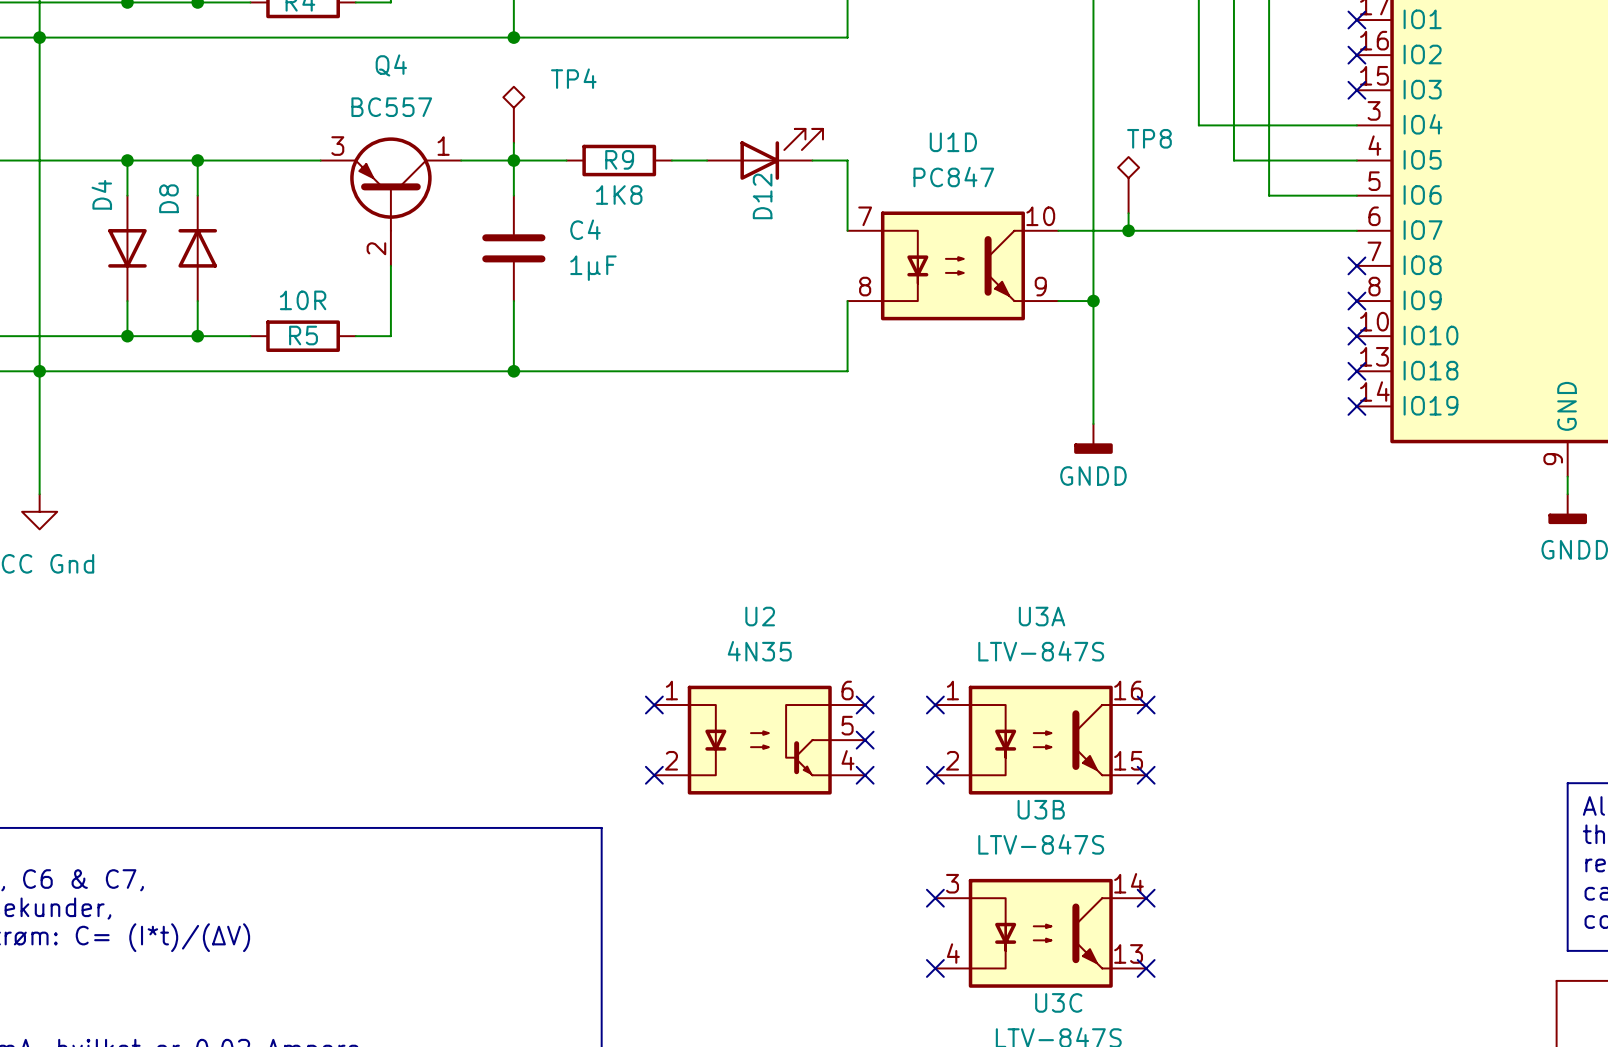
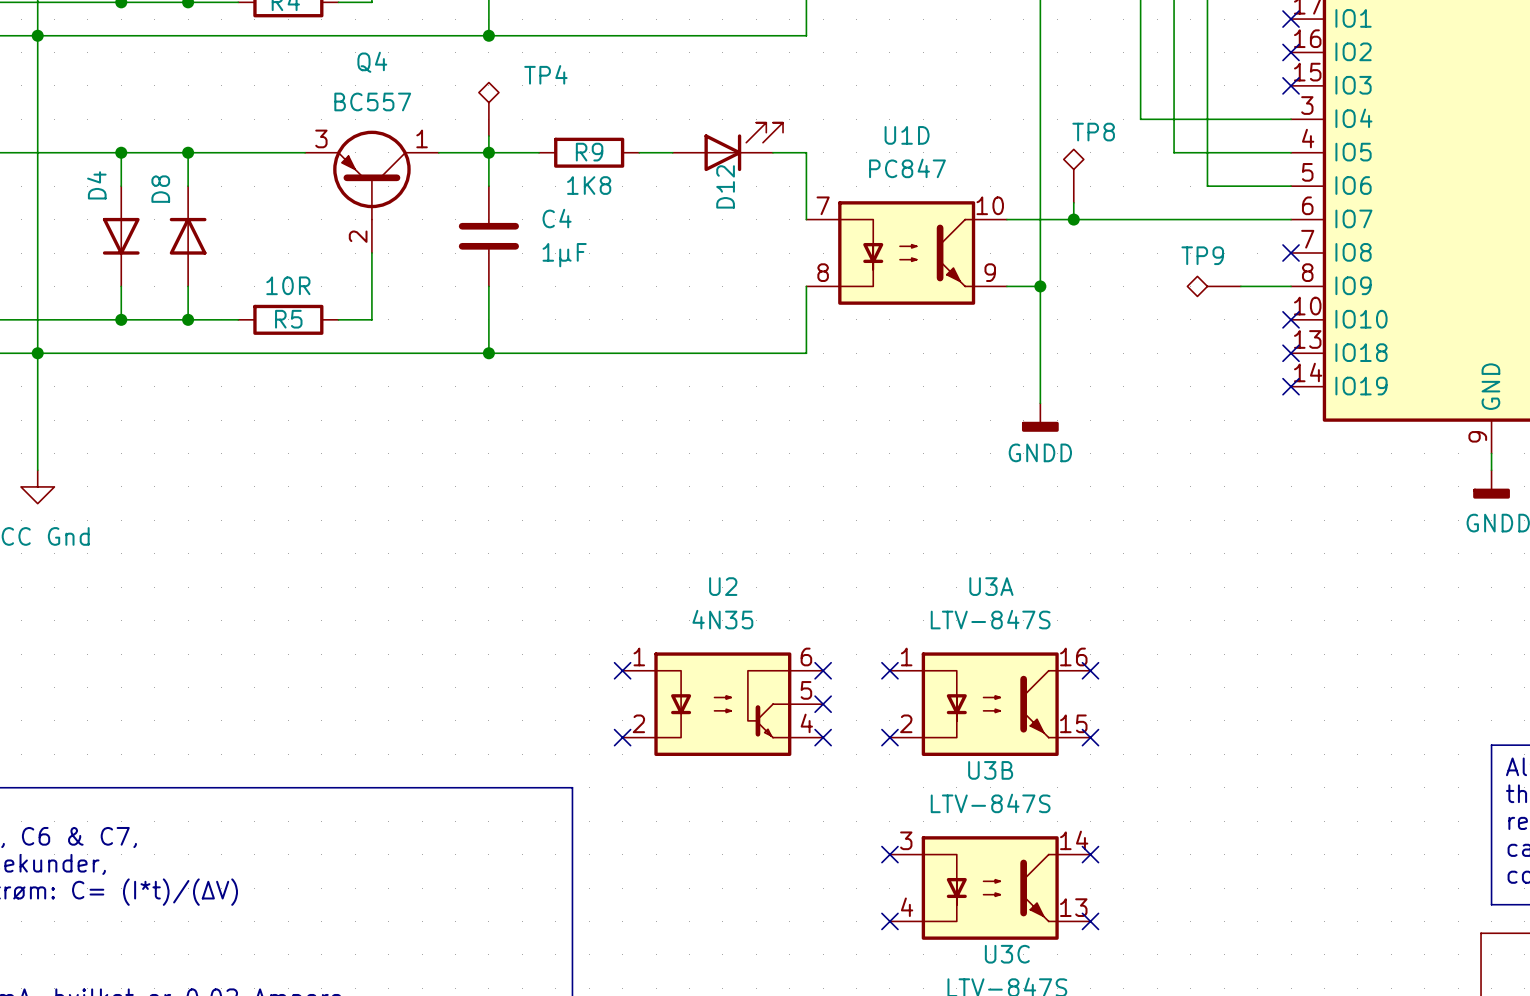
TP9: none -> (1214, 286)
wire: none -> (1240, 286) (1291, 286)
no-connect mark: (1356, 301) -> none

